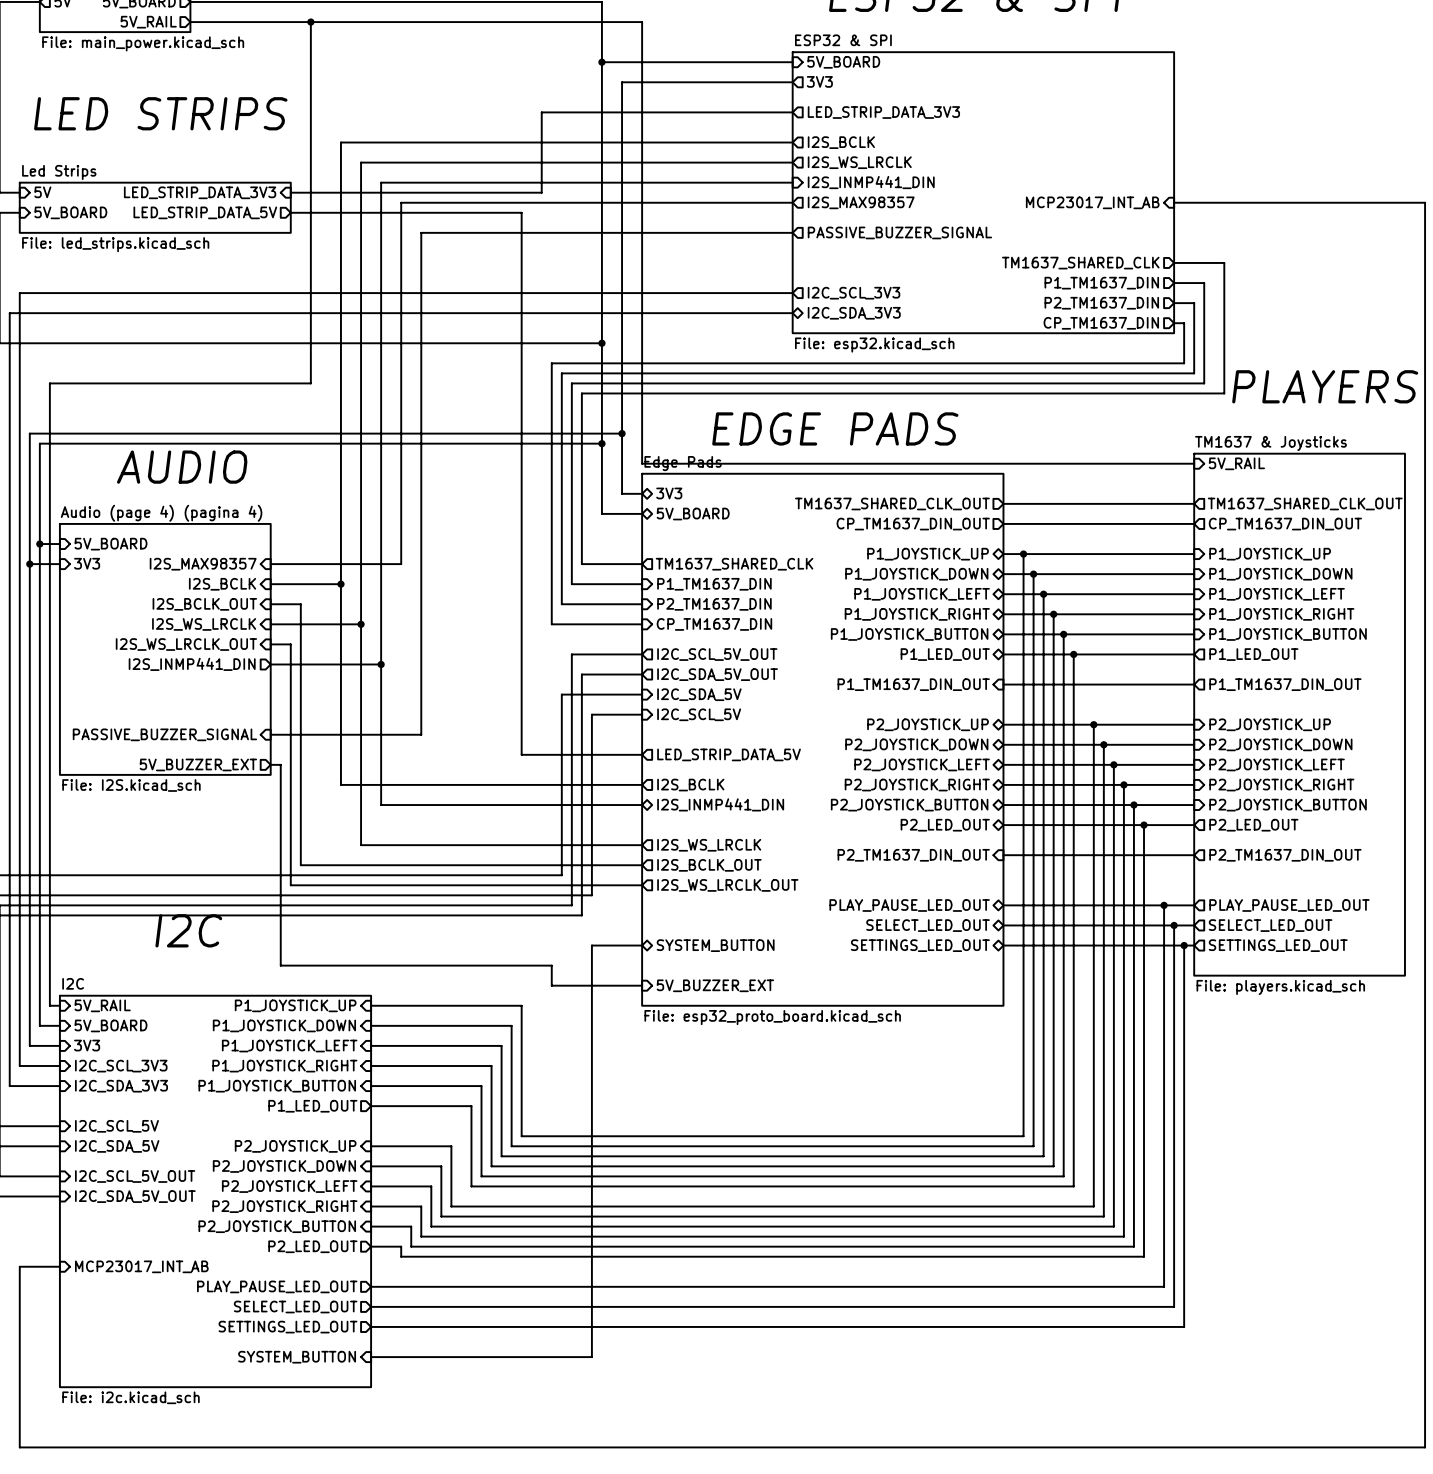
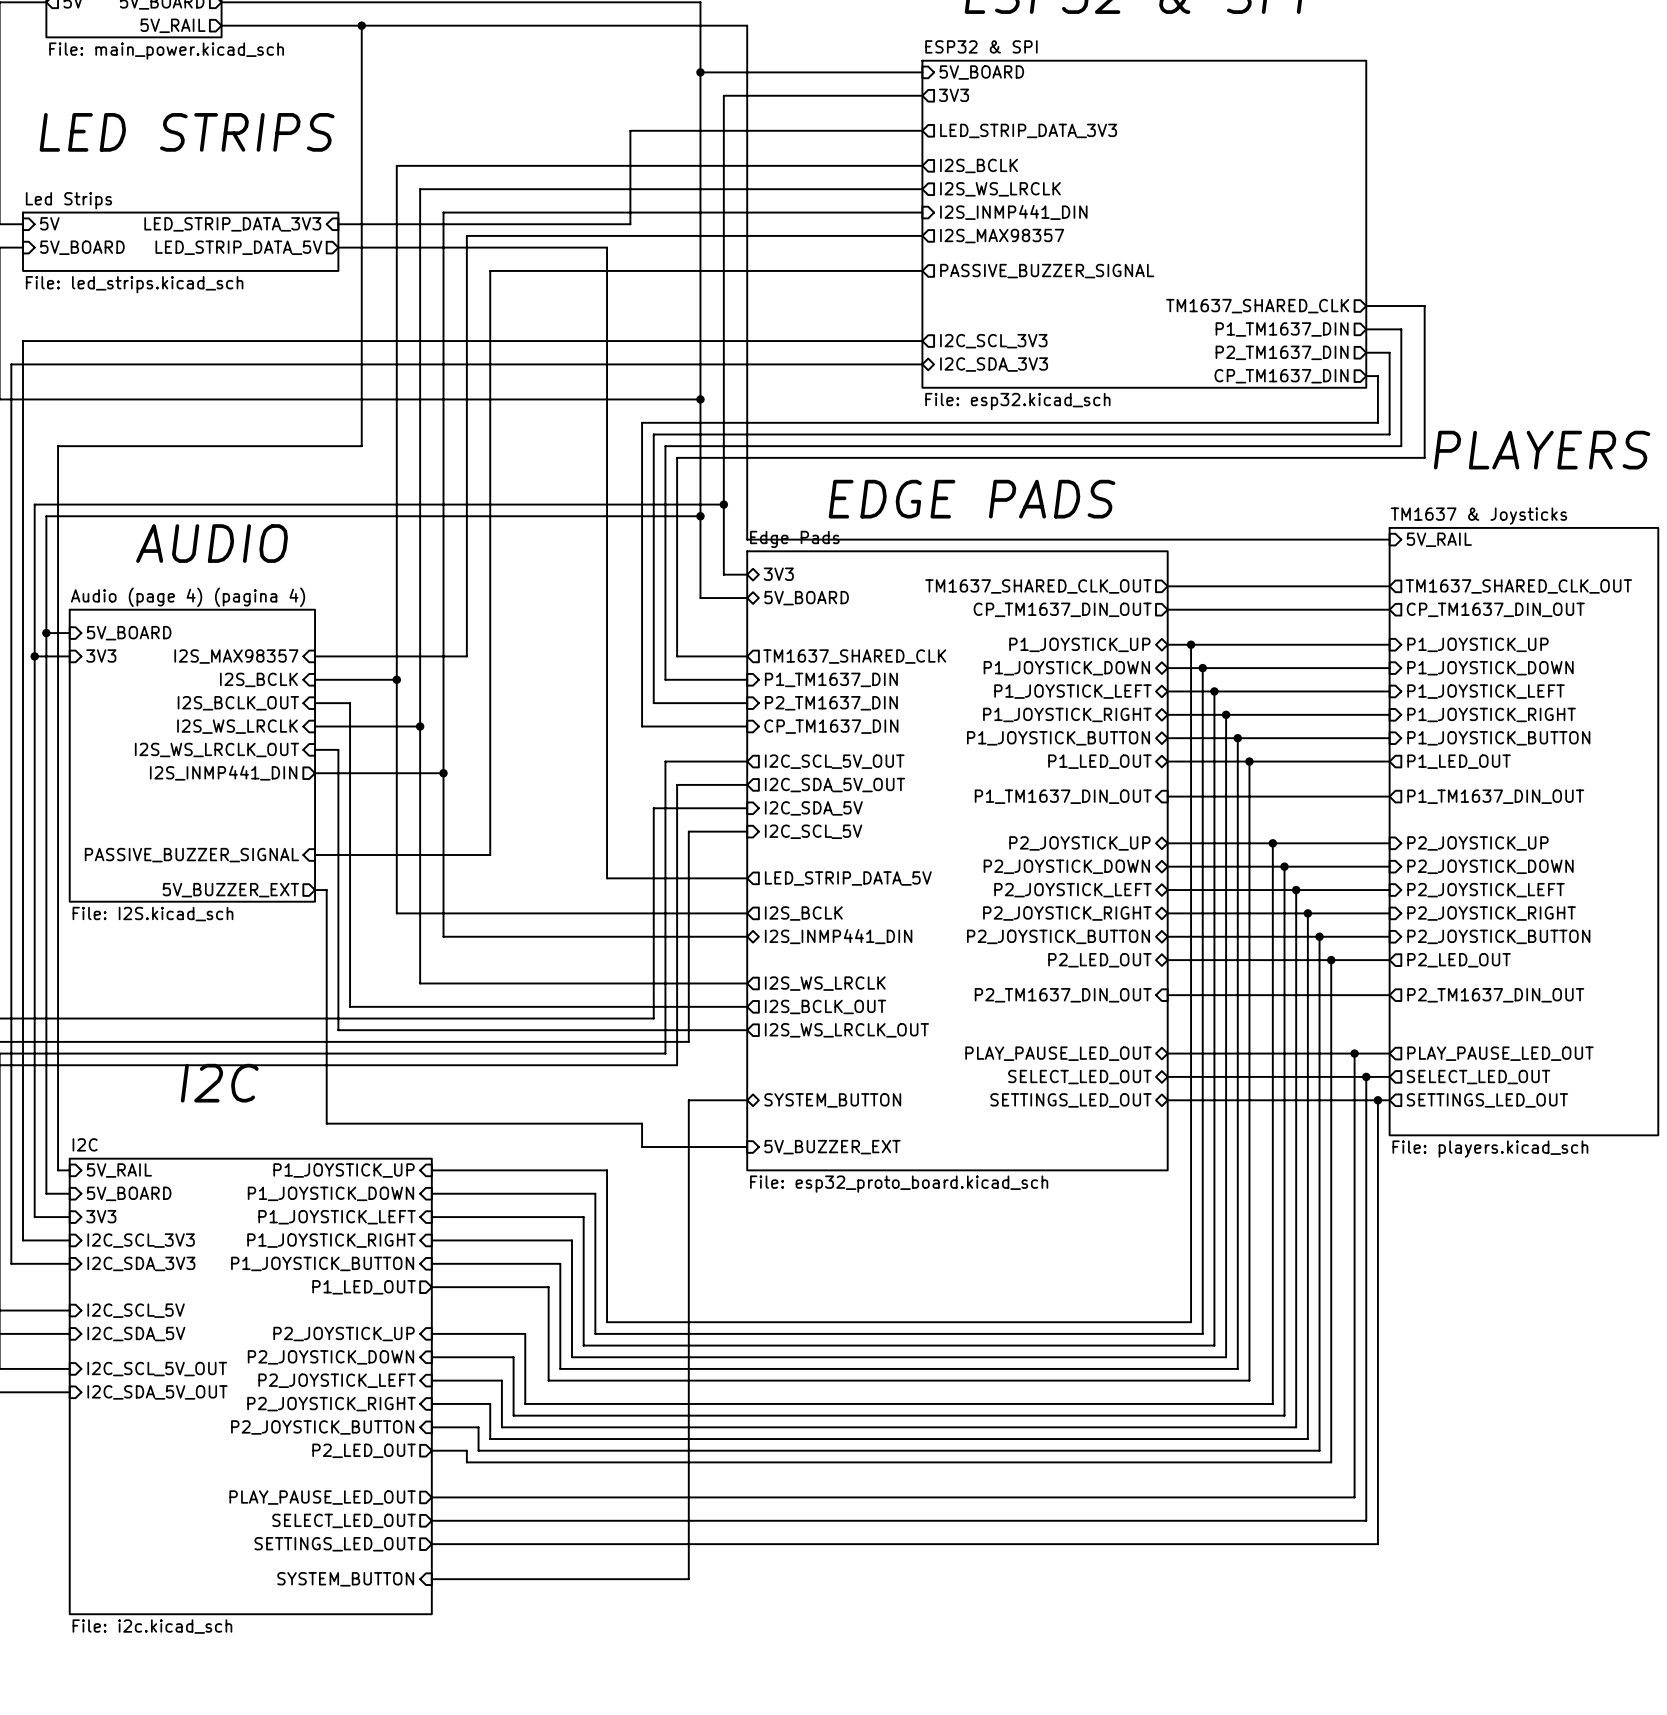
sheet pin: MCP23017_INT_AB (1092, 202) -> none
wire: (1174, 202) (1425, 202) (1425, 1447) (19, 1447) (19, 1266) (59, 1266) -> none
sheet TM1637 & Joysticks shape: [1193, 453, 1406, 977] -> [1388, 527, 1659, 1137]
sheet pin: MCP23017_INT_AB (141, 1266) -> none

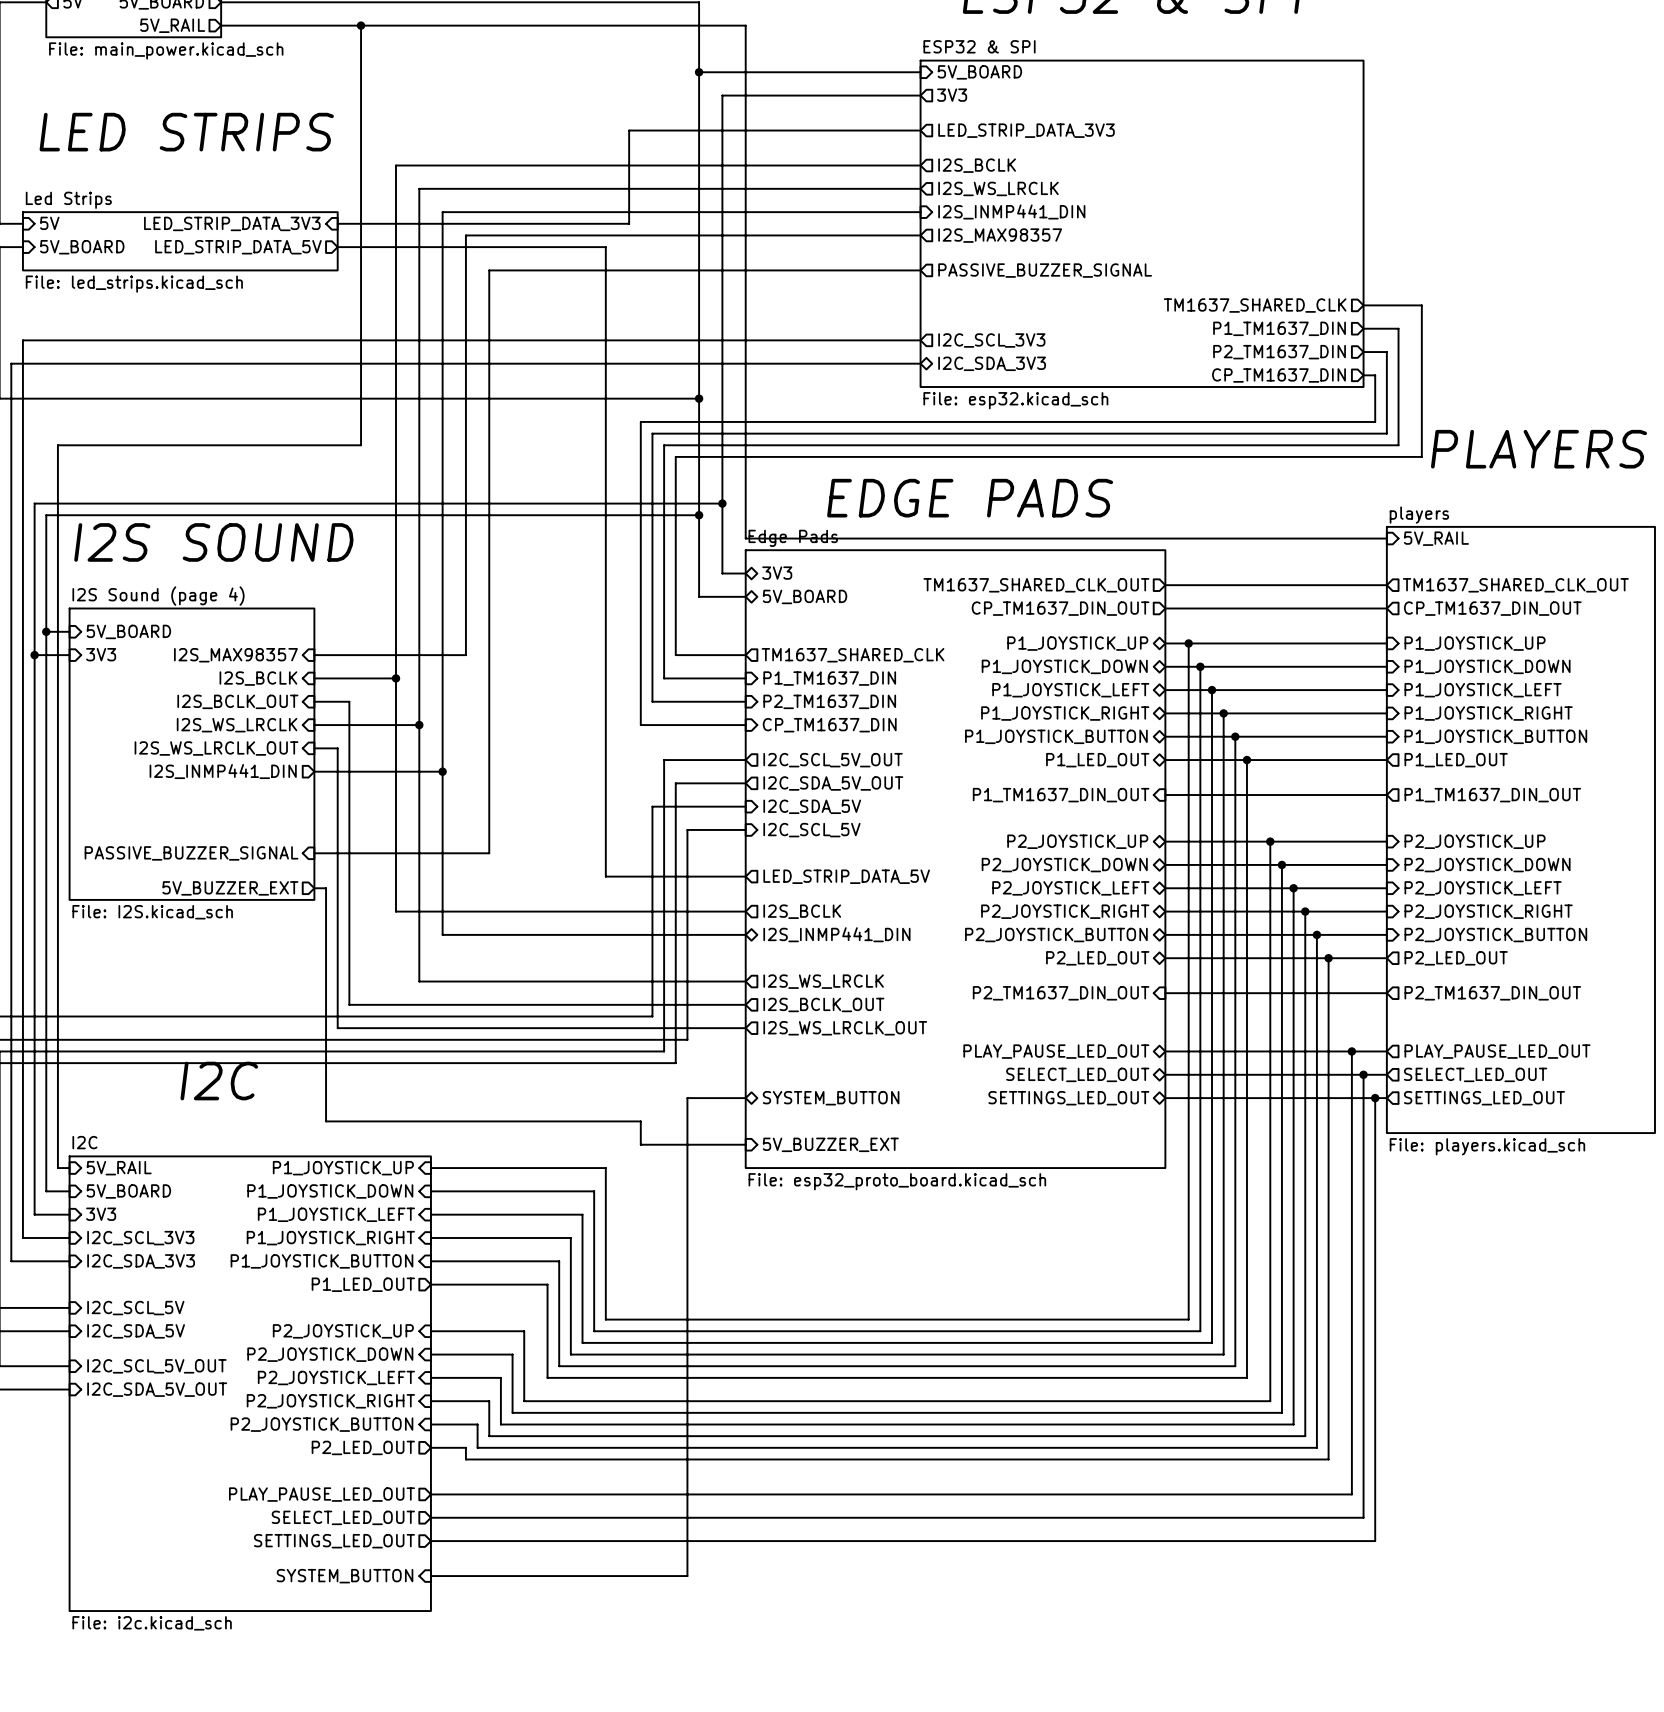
sheet TM1637 & Joysticks name: TM1637 & Joysticks (1478, 516) -> players (1419, 515)
text: AUDIO (212, 543) -> I2S SOUND (213, 542)
sheet Audio (page 4) (pagina 4) name: Audio (page 4) (pagina 4) (188, 597) -> I2S Sound (page 4) (158, 596)

